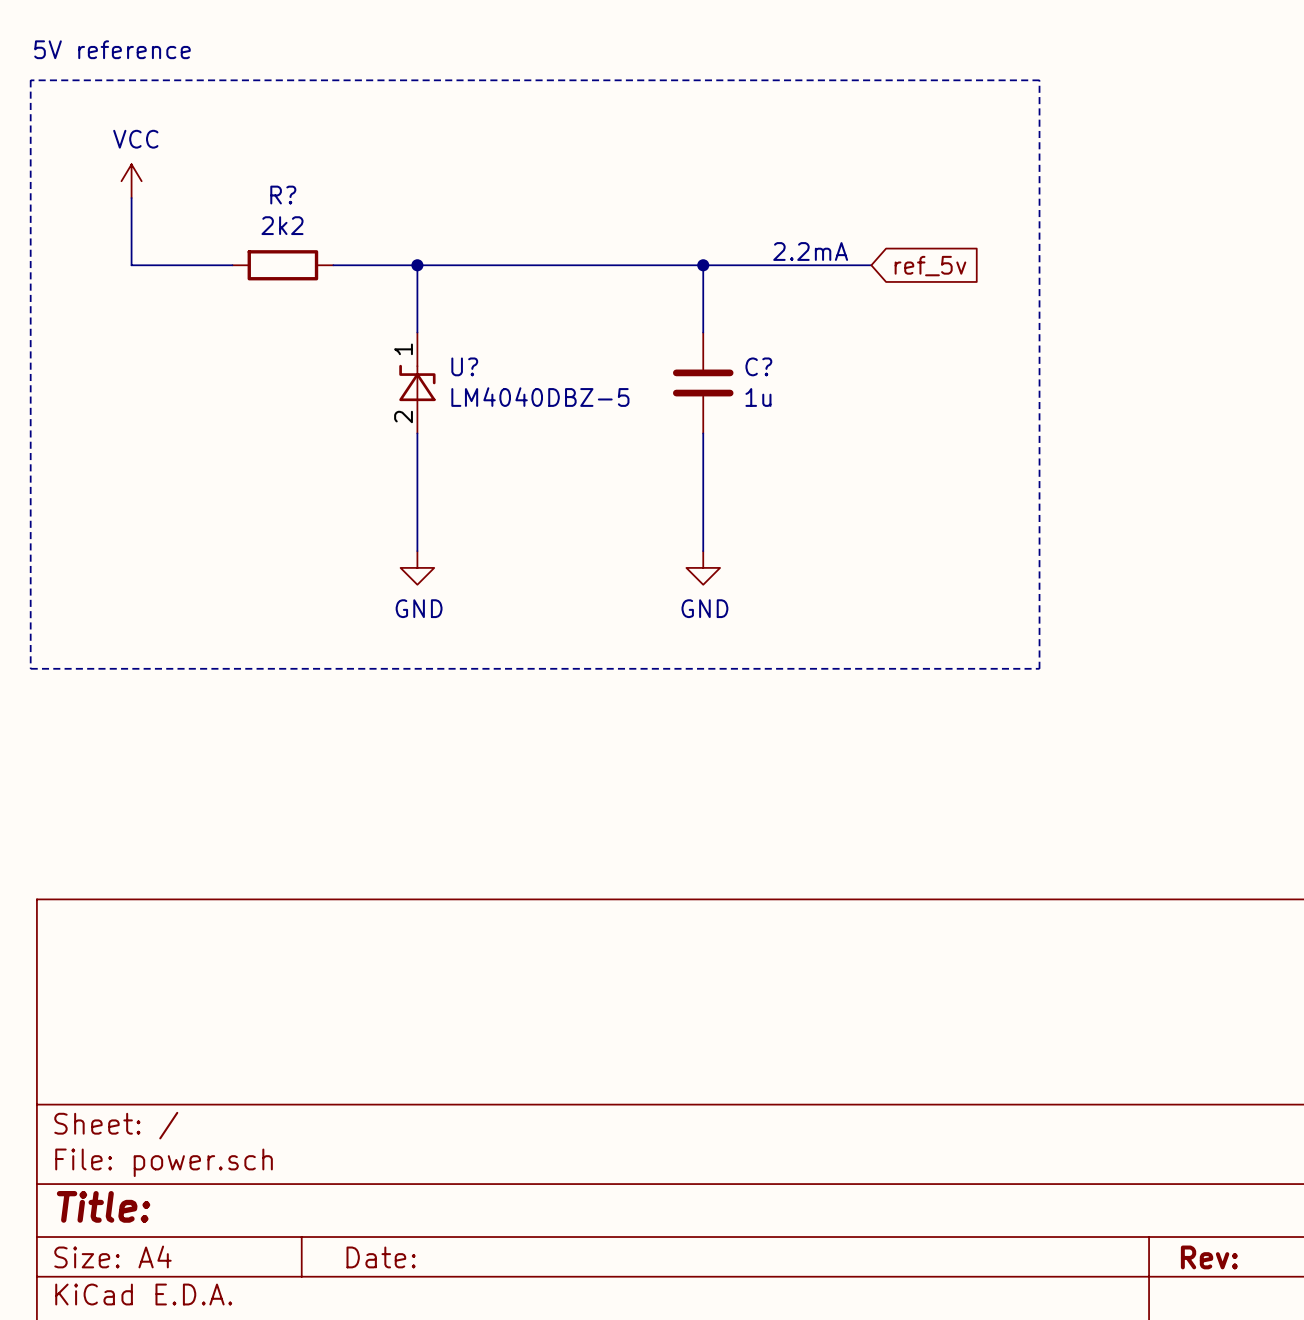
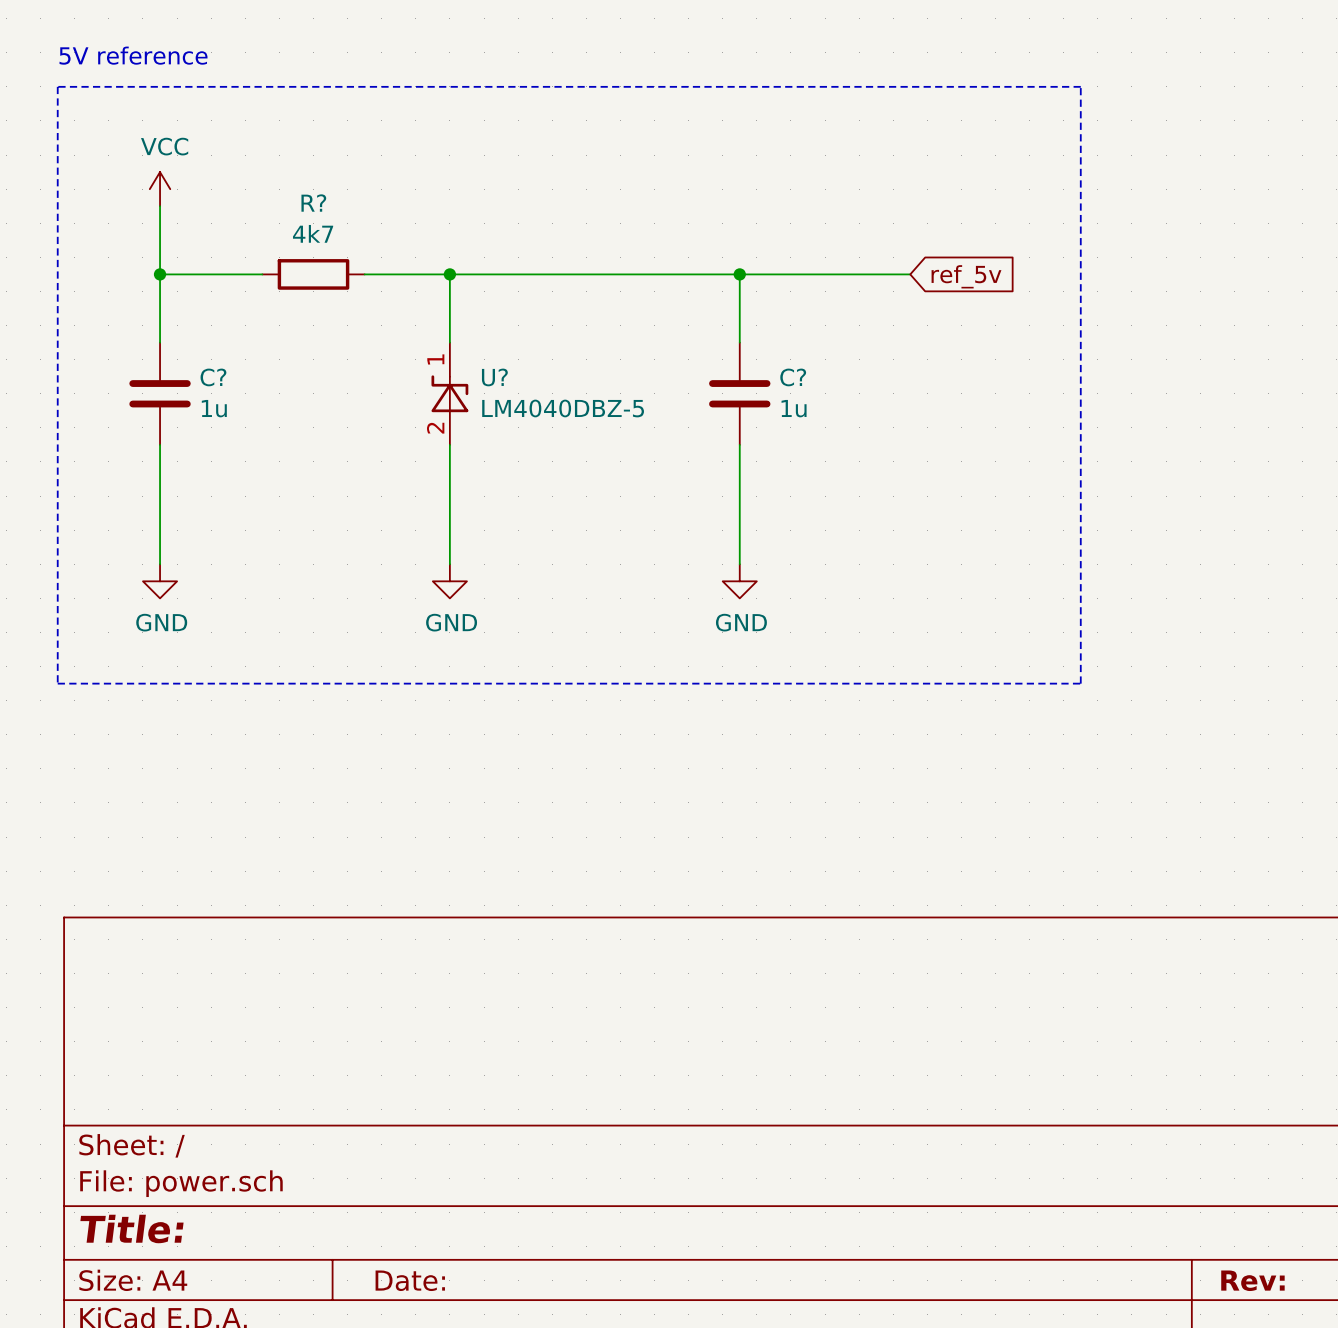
R? value: 2k2 (282, 225) -> 4k7 (313, 233)
text: 2.2mA (810, 251) -> none
wire: none -> (160, 274) (160, 342)
junction: none -> (160, 274)
C?: none -> 1u (160, 393)
wire: none -> (160, 444) (160, 564)
power symbol: none -> GND (160, 581)

